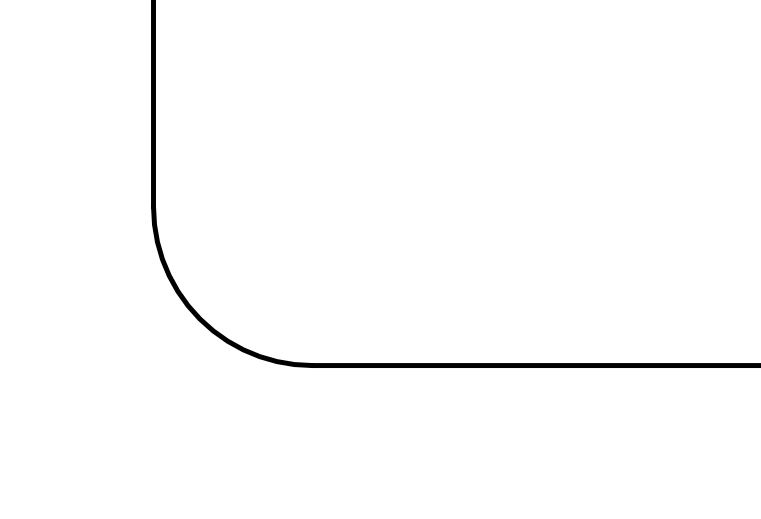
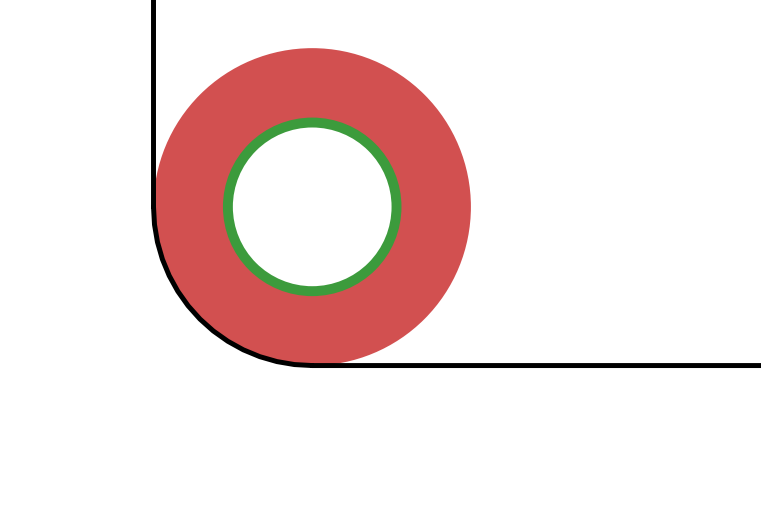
part: none -> (312, 206)

